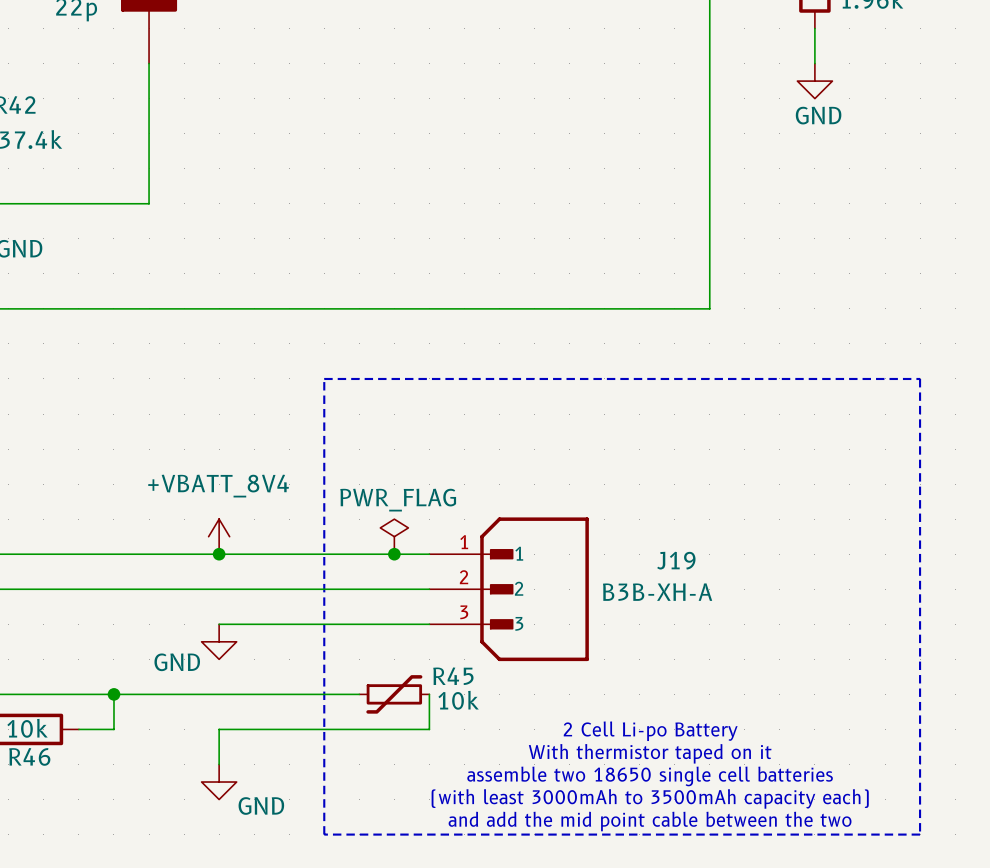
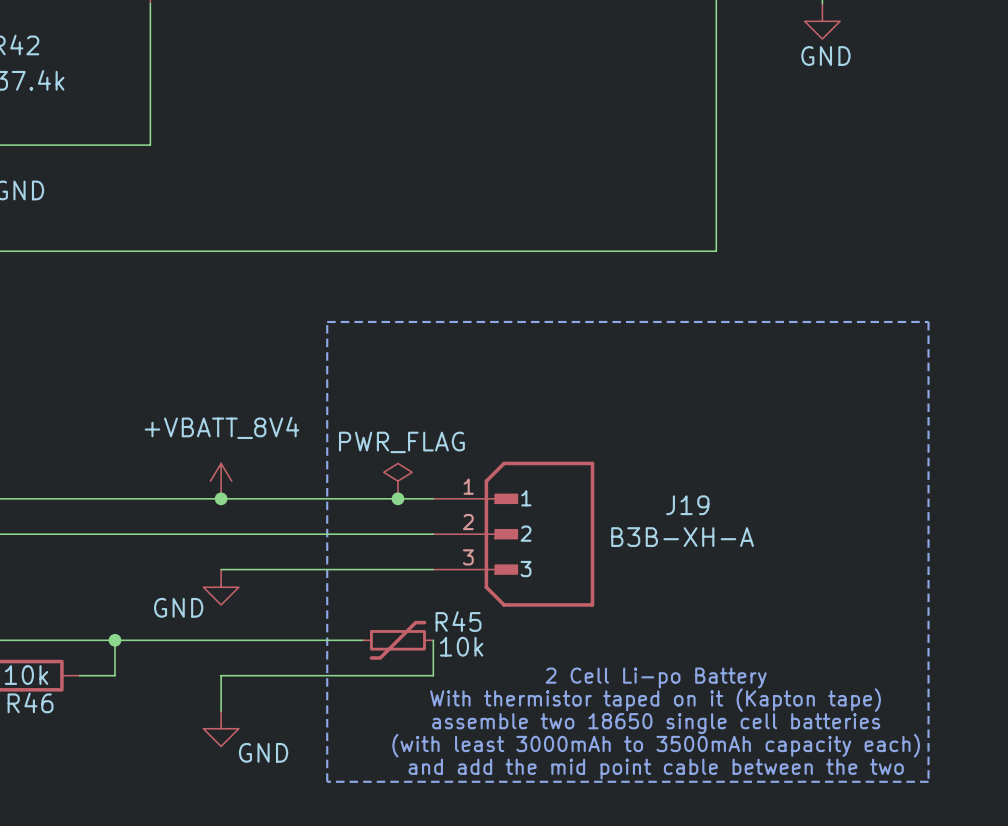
text: With thermistor taped on it (650, 753) -> With thermistor taped on it (Kapton tape) (655, 700)

